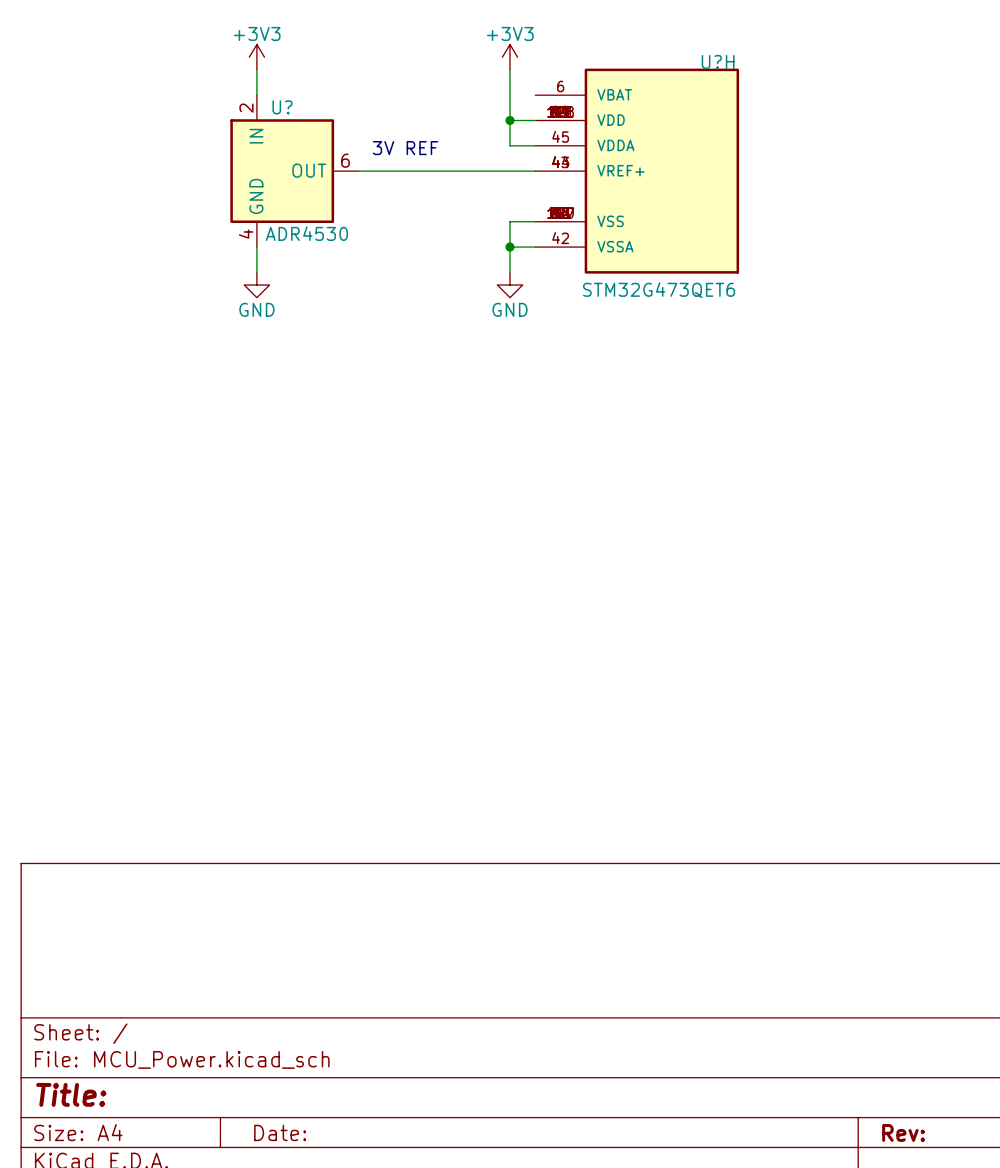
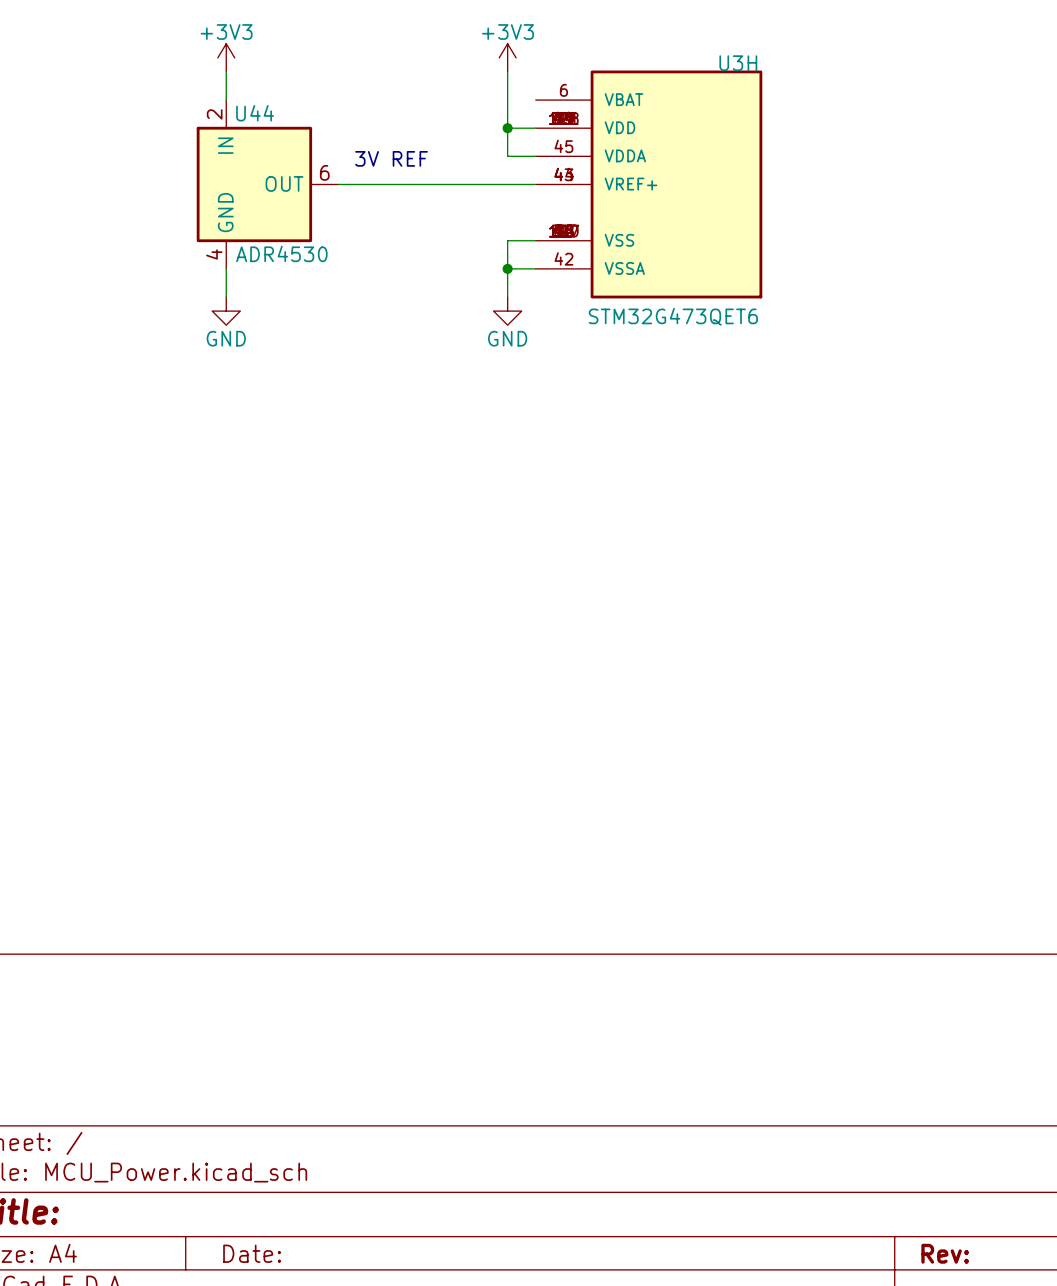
U?H name: U?H (718, 61) -> U3H (738, 63)
U? name: U? (282, 107) -> U44 (255, 113)

